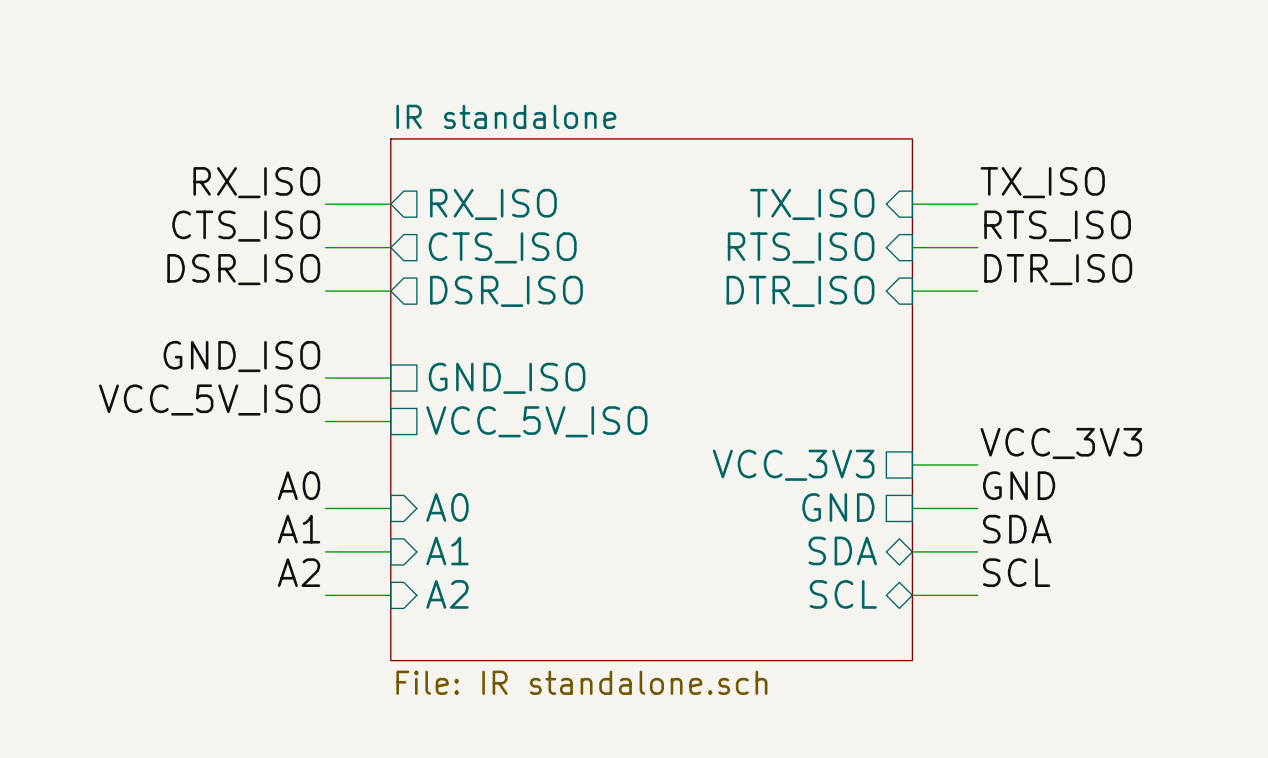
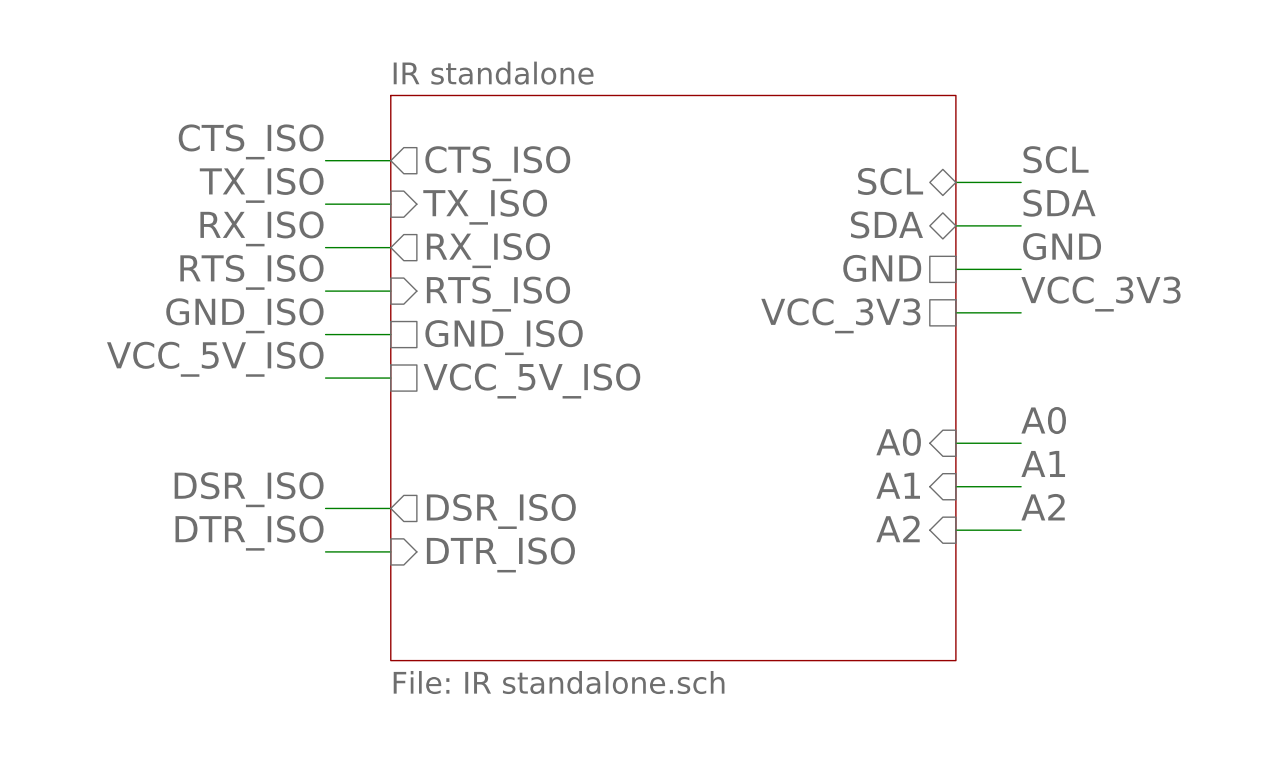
label: none -> CTS_ISO (251, 141)
sheet pin: none -> CTS_ISO (497, 163)
label: RX_ISO (256, 182) -> TX_ISO (261, 185)
label: TX_ISO (1042, 182) -> none
sheet pin shape: output (493, 204) -> input (485, 207)
sheet pin: RX_ISO (493, 204) -> TX_ISO (485, 207)
sheet pin: TX_ISO (812, 204) -> none
wire: (912, 204) (977, 204) -> (955, 182) (1021, 182)
label: CTS_ISO (246, 226) -> RX_ISO (261, 228)
label: RTS_ISO (1057, 226) -> none
sheet pin: CTS_ISO (502, 247) -> RX_ISO (488, 250)
sheet pin: RTS_ISO (801, 247) -> none
wire: (912, 247) (977, 247) -> (955, 225) (1021, 225)
label: DSR_ISO (243, 269) -> RTS_ISO (251, 272)
label: DTR_ISO (1058, 269) -> none
sheet pin shape: output (506, 291) -> input (498, 294)
sheet pin: DSR_ISO (506, 291) -> RTS_ISO (498, 294)
sheet pin: DTR_ISO (800, 291) -> none
wire: (912, 291) (977, 291) -> (955, 269) (1021, 269)
label: none -> GND_ISO (244, 315)
sheet pin: none -> GND_ISO (504, 337)
label: GND_ISO (241, 356) -> VCC_5V_ISO (215, 359)
sheet pin: GND_ISO (507, 378) -> VCC_5V_ISO (531, 381)
sheet IR standalone: none -> File: IR standalone.sch (673, 378)
sheet IR standalone: File: IR standalone.sch (651, 399) -> none
label: VCC_5V_ISO (209, 400) -> none
label: none -> A0 (1043, 420)
wire: (325, 421) (390, 421) -> (325, 160) (390, 160)
sheet pin: VCC_5V_ISO (536, 421) -> none
sheet pin: none -> A0 (898, 442)
label position: VCC_3V3 (1061, 443) -> VCC_3V3 (1100, 294)
label: none -> A1 (1043, 463)
wire: (912, 464) (977, 464) -> (955, 443) (1021, 443)
sheet pin position: VCC_3V3 (793, 465) -> VCC_3V3 (840, 315)
label: A0 (299, 485) -> DSR_ISO (249, 489)
sheet pin: none -> A1 (898, 485)
label position: GND (1019, 485) -> GND (1062, 246)
sheet pin shape: input (447, 507) -> output (501, 511)
sheet pin: A0 (447, 507) -> DSR_ISO (501, 511)
sheet pin position: GND (838, 507) -> GND (882, 268)
label: none -> A2 (1043, 507)
wire: (912, 508) (977, 508) -> (955, 486) (1021, 486)
label: A1 (299, 529) -> DTR_ISO (249, 533)
sheet pin: none -> A2 (898, 528)
label position: SDA (1017, 529) -> SDA (1059, 203)
sheet pin: A1 (447, 550) -> DTR_ISO (500, 554)
sheet pin position: SDA (842, 550) -> SDA (886, 224)
wire: (912, 551) (977, 551) -> (955, 530) (1021, 530)
label: A2 (299, 572) -> none
label position: SCL (1016, 572) -> SCL (1056, 159)
sheet pin: A2 (447, 594) -> none
sheet pin position: SCL (843, 594) -> SCL (890, 181)
wire: (325, 595) (390, 595) -> (325, 334) (390, 334)
wire: (912, 595) (977, 595) -> (955, 312) (1021, 312)

